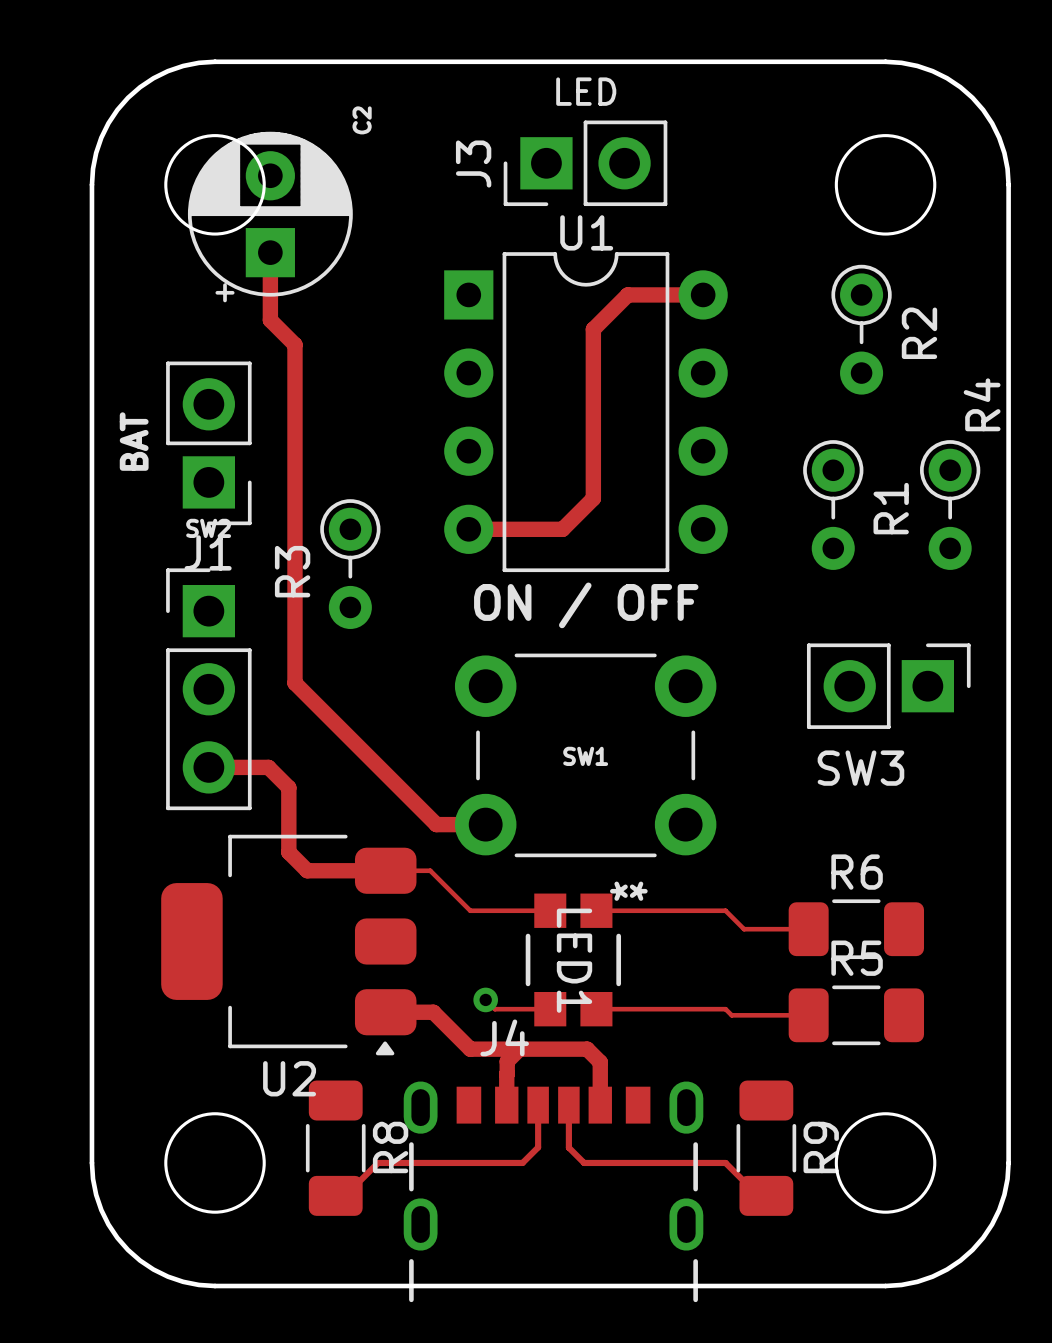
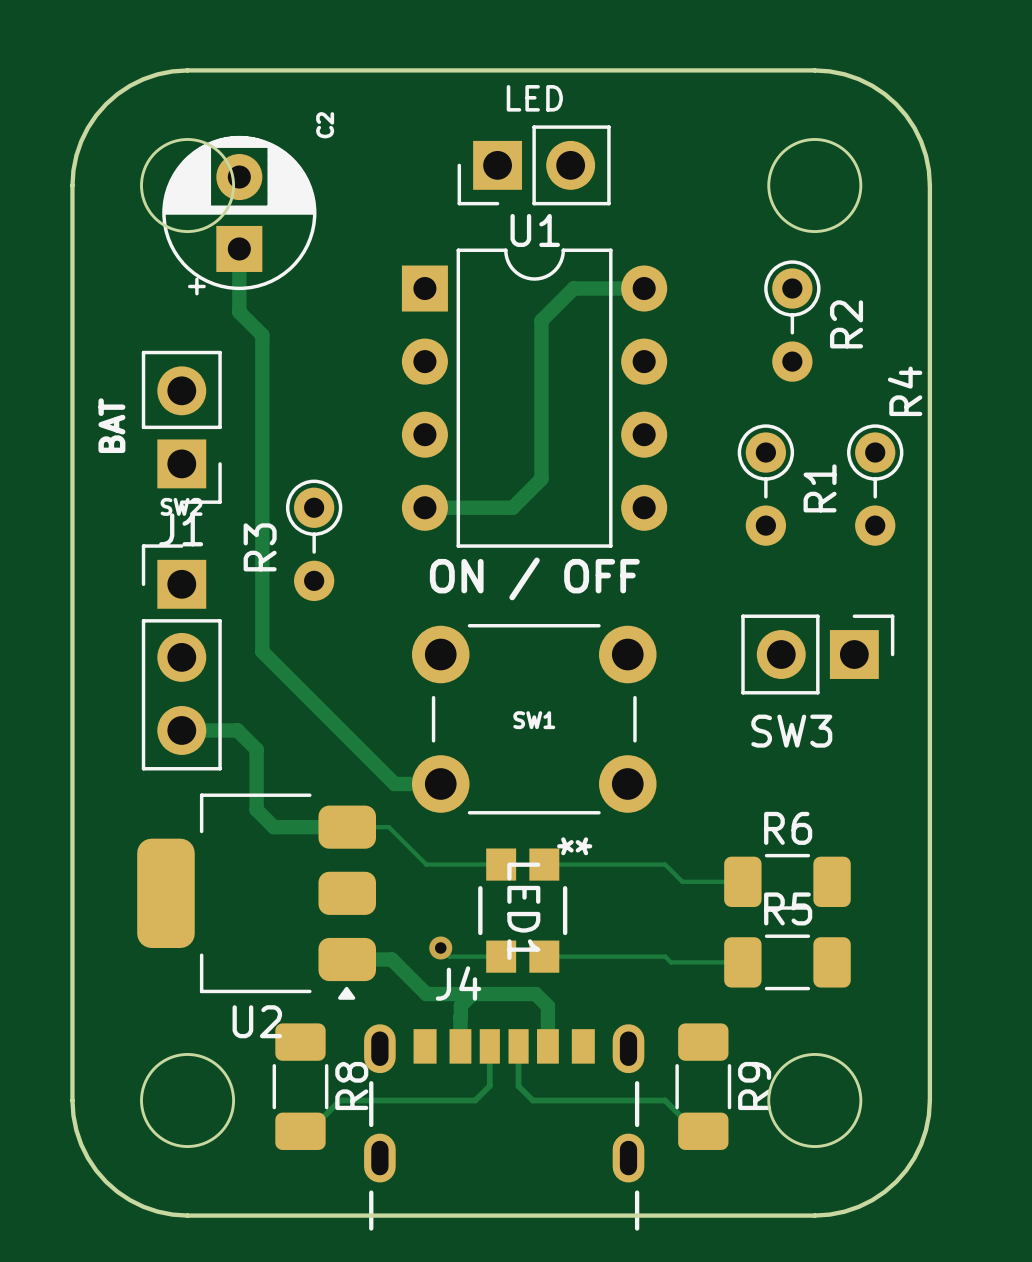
J3 name: J3 (473, 164) -> none

